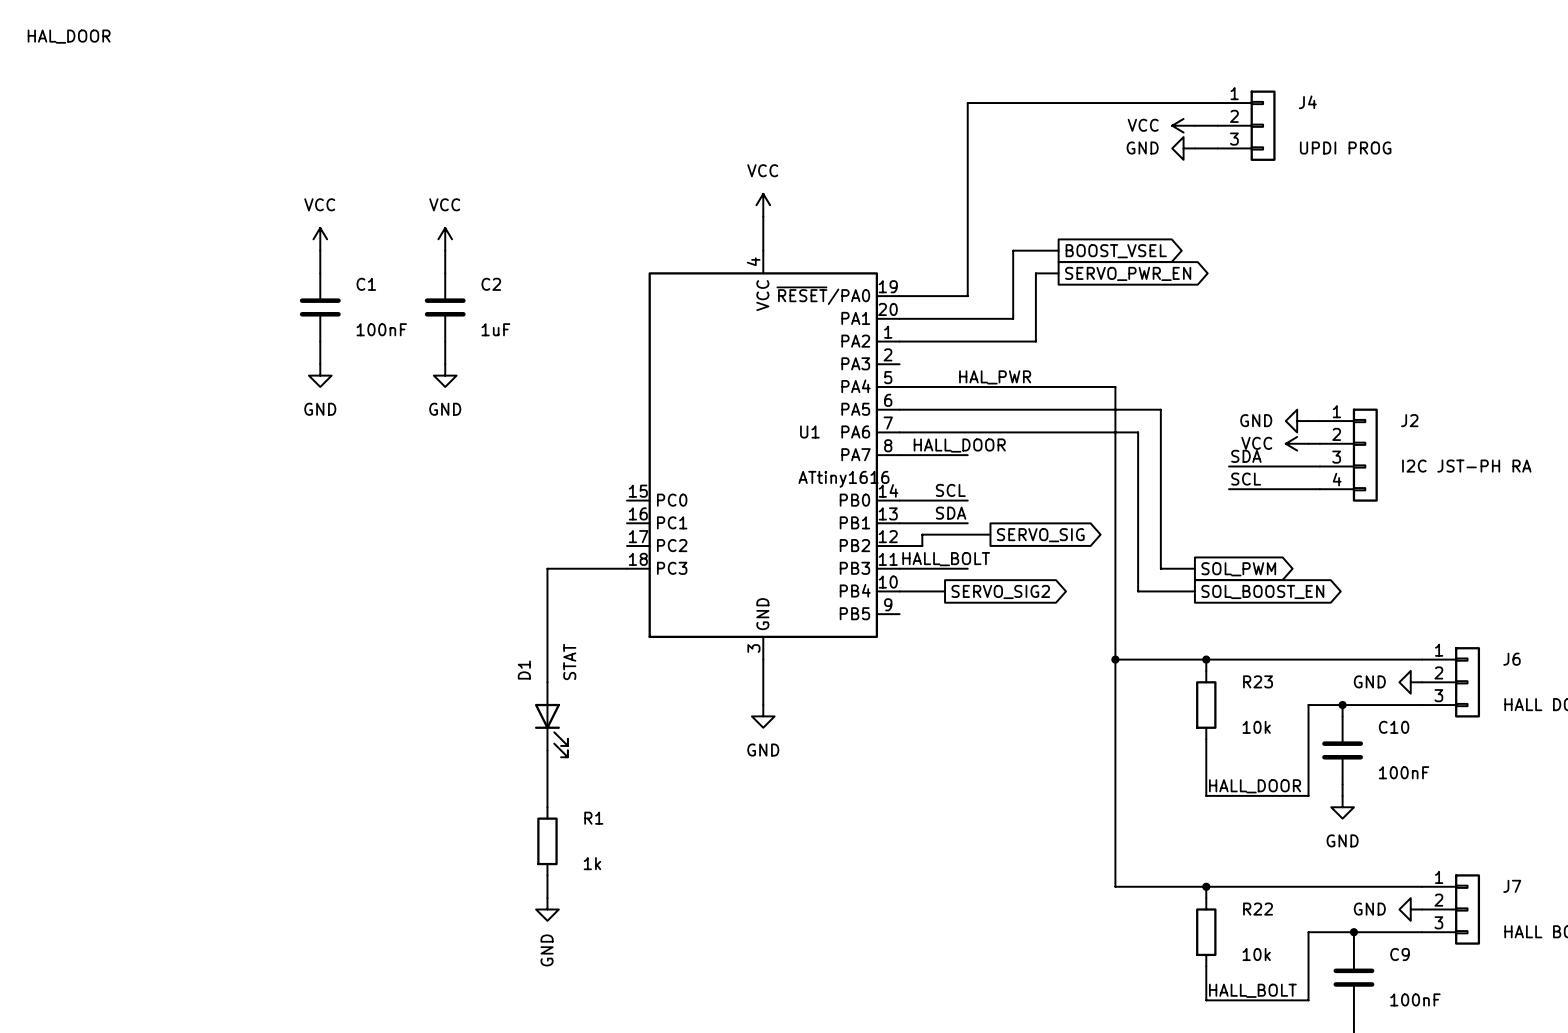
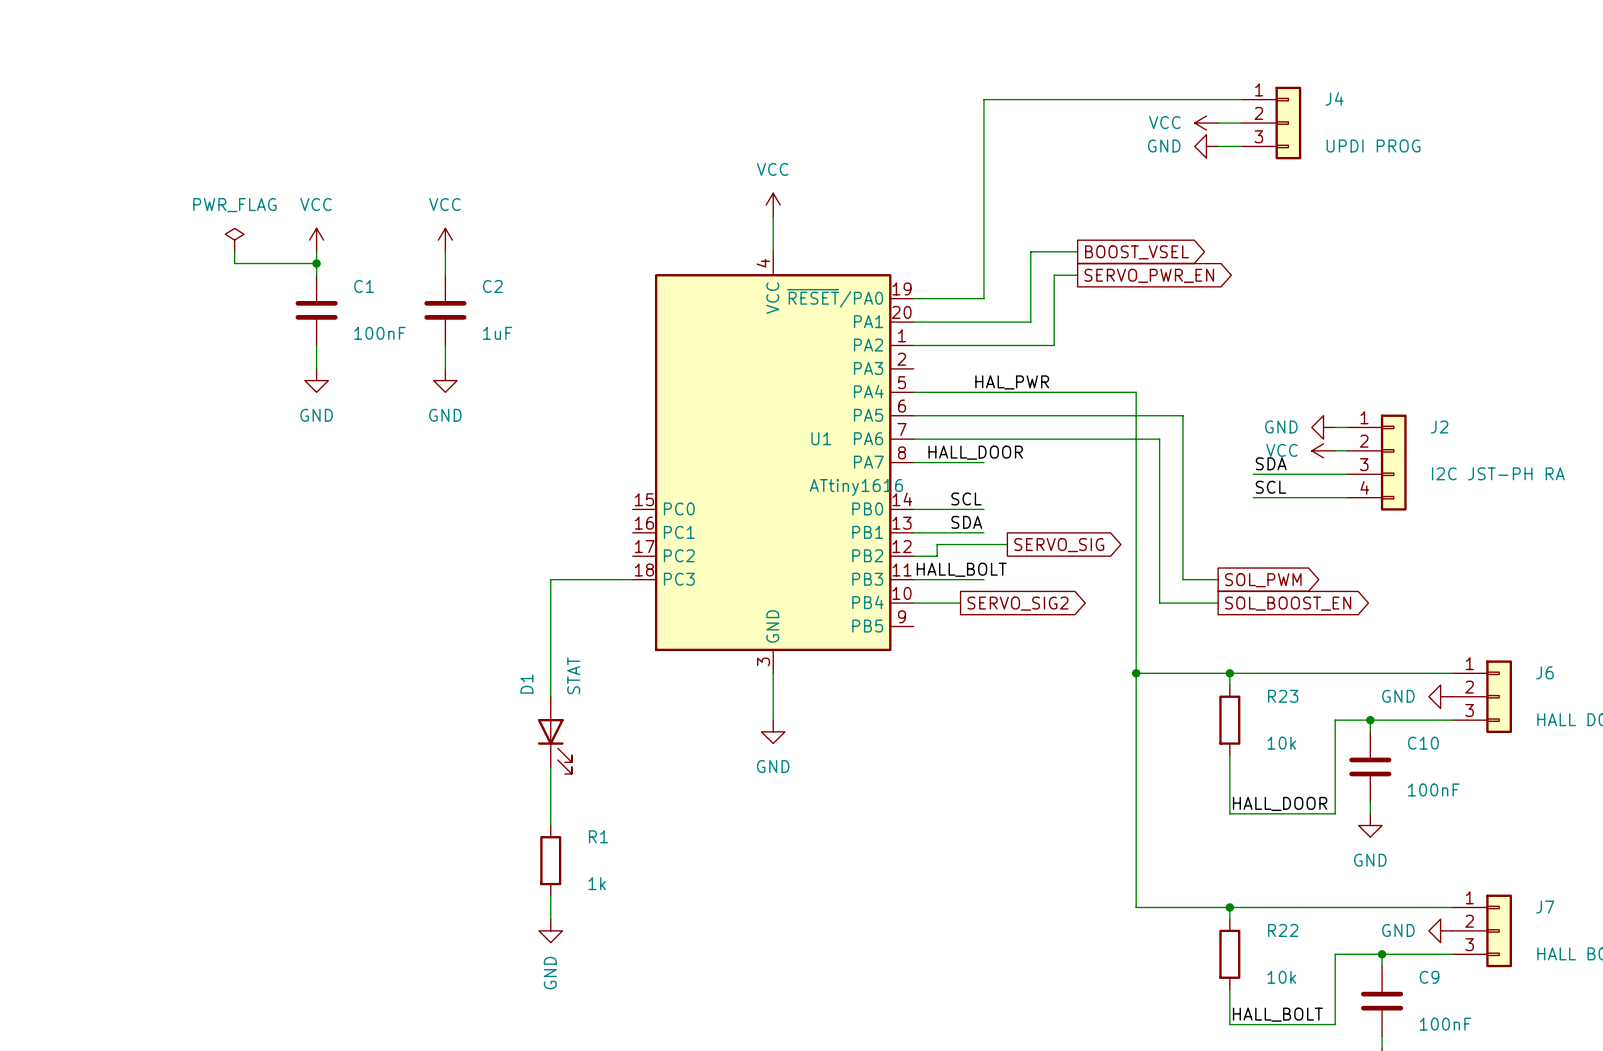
label: HAL_DOOR (69, 36) -> none
power symbol: none -> PWR_FLAG (234, 240)
wire: none -> (234, 251) (234, 263) (316, 263)
junction: none -> (316, 263)

